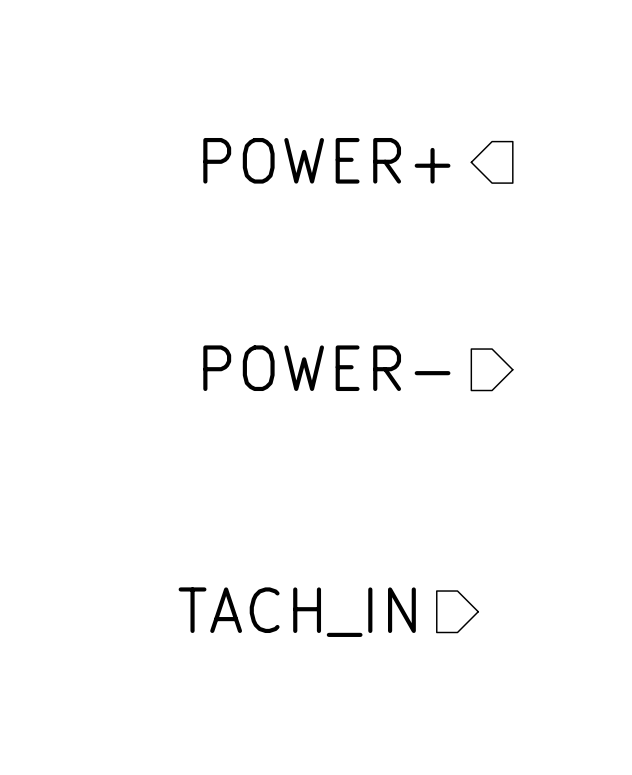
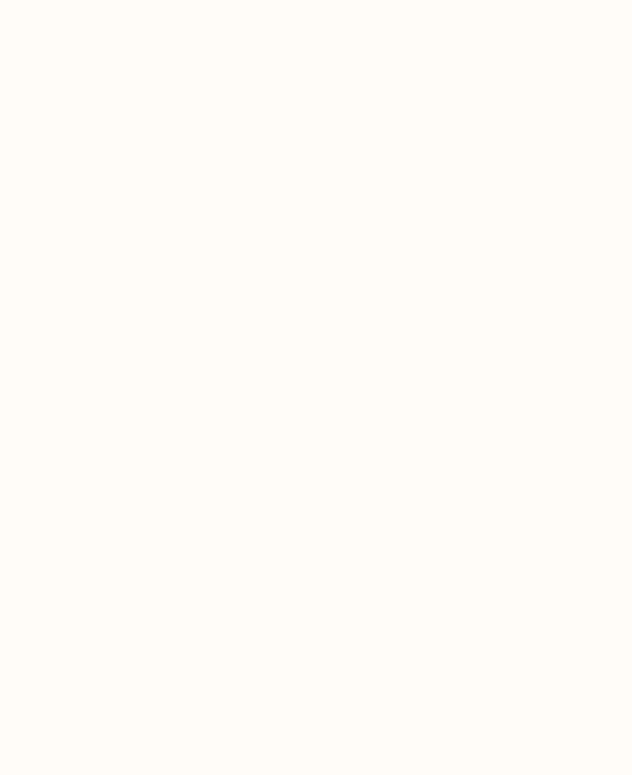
hierarchical label: POWER+ (326, 160) -> none
hierarchical label: POWER- (326, 368) -> none
hierarchical label: TACH_IN (297, 612) -> none

